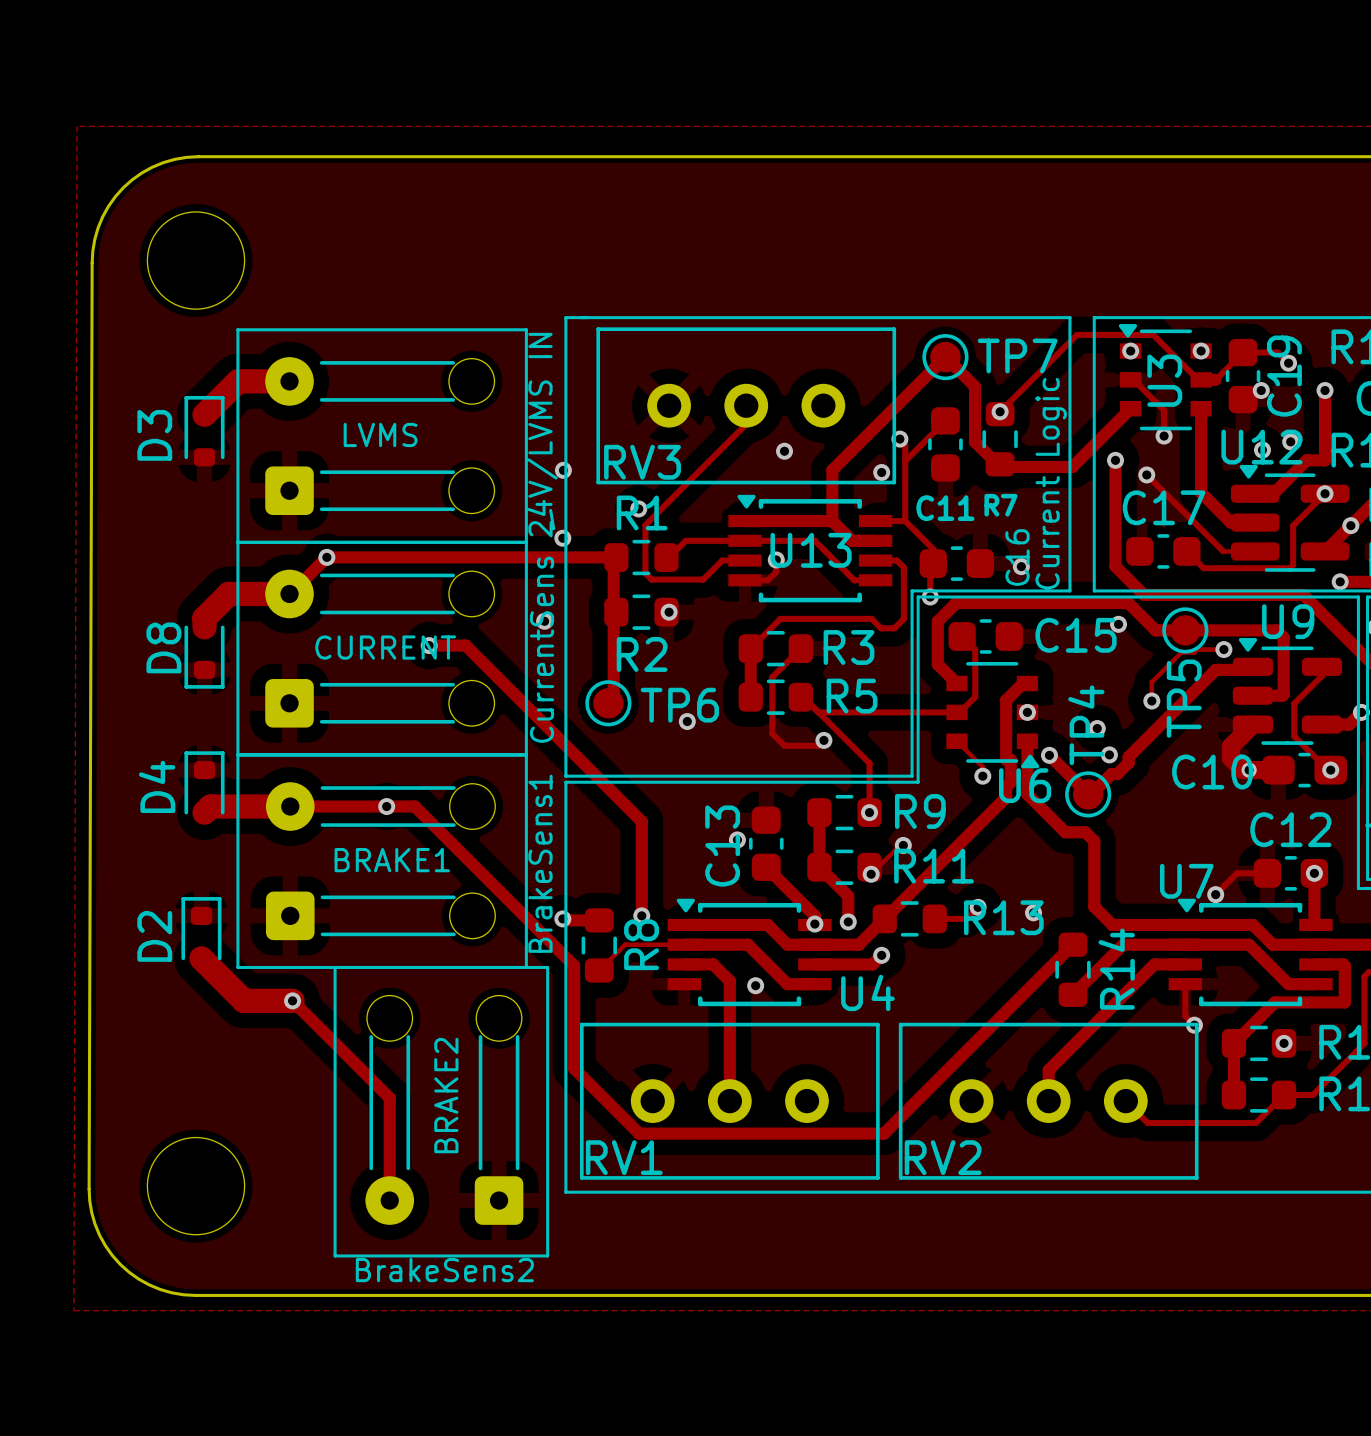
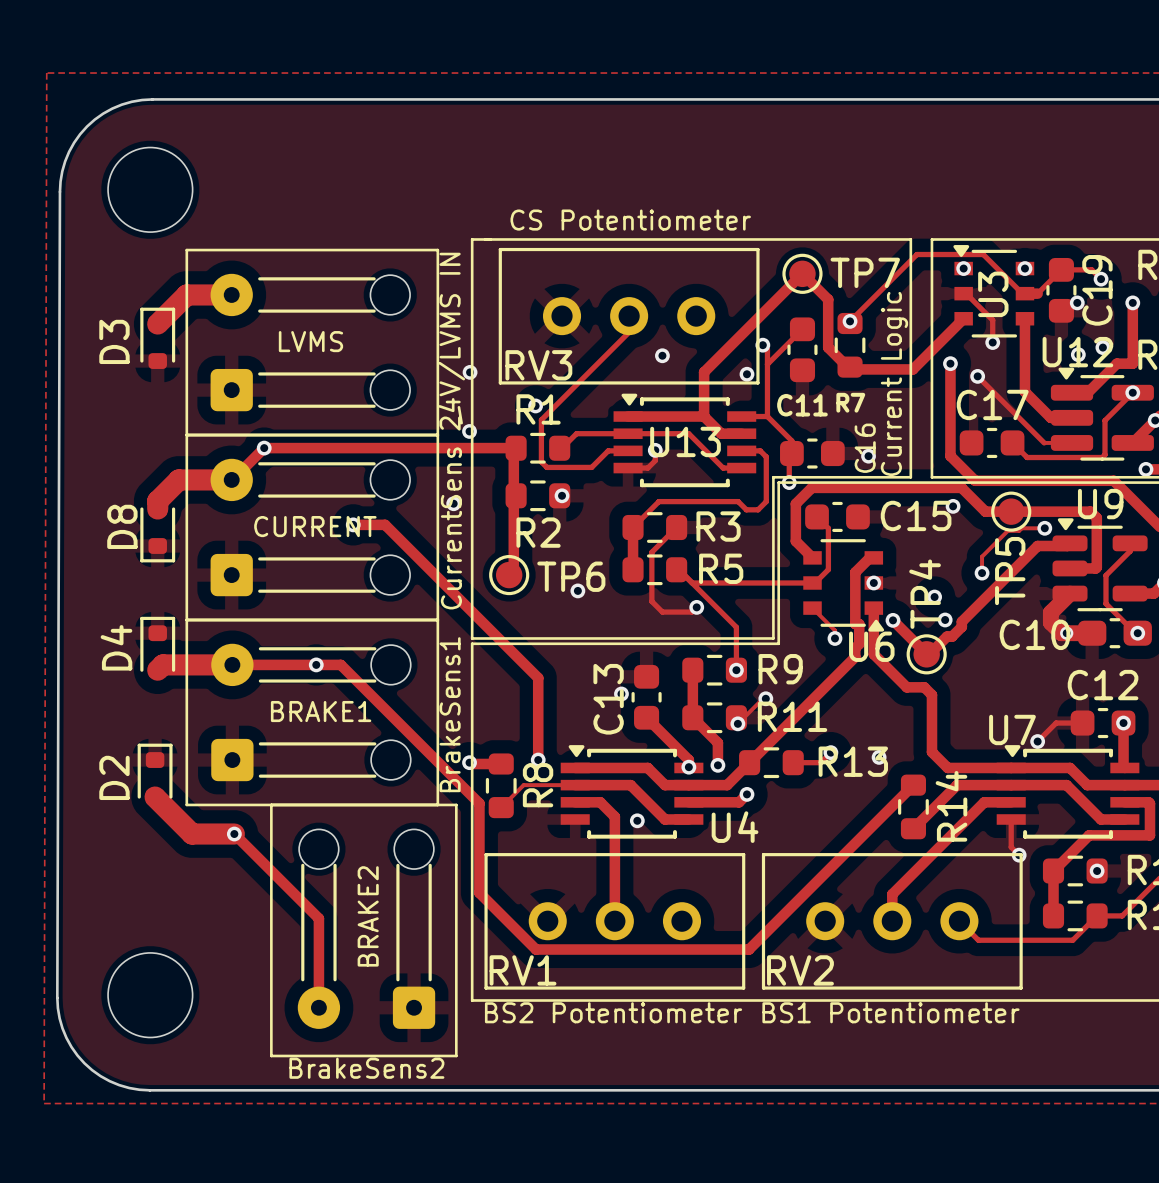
text: none -> CS Potentiometer (630, 220)
text: none -> BS2 Potentiometer (613, 1012)
text: none -> BS1 Potentiometer (890, 1012)

